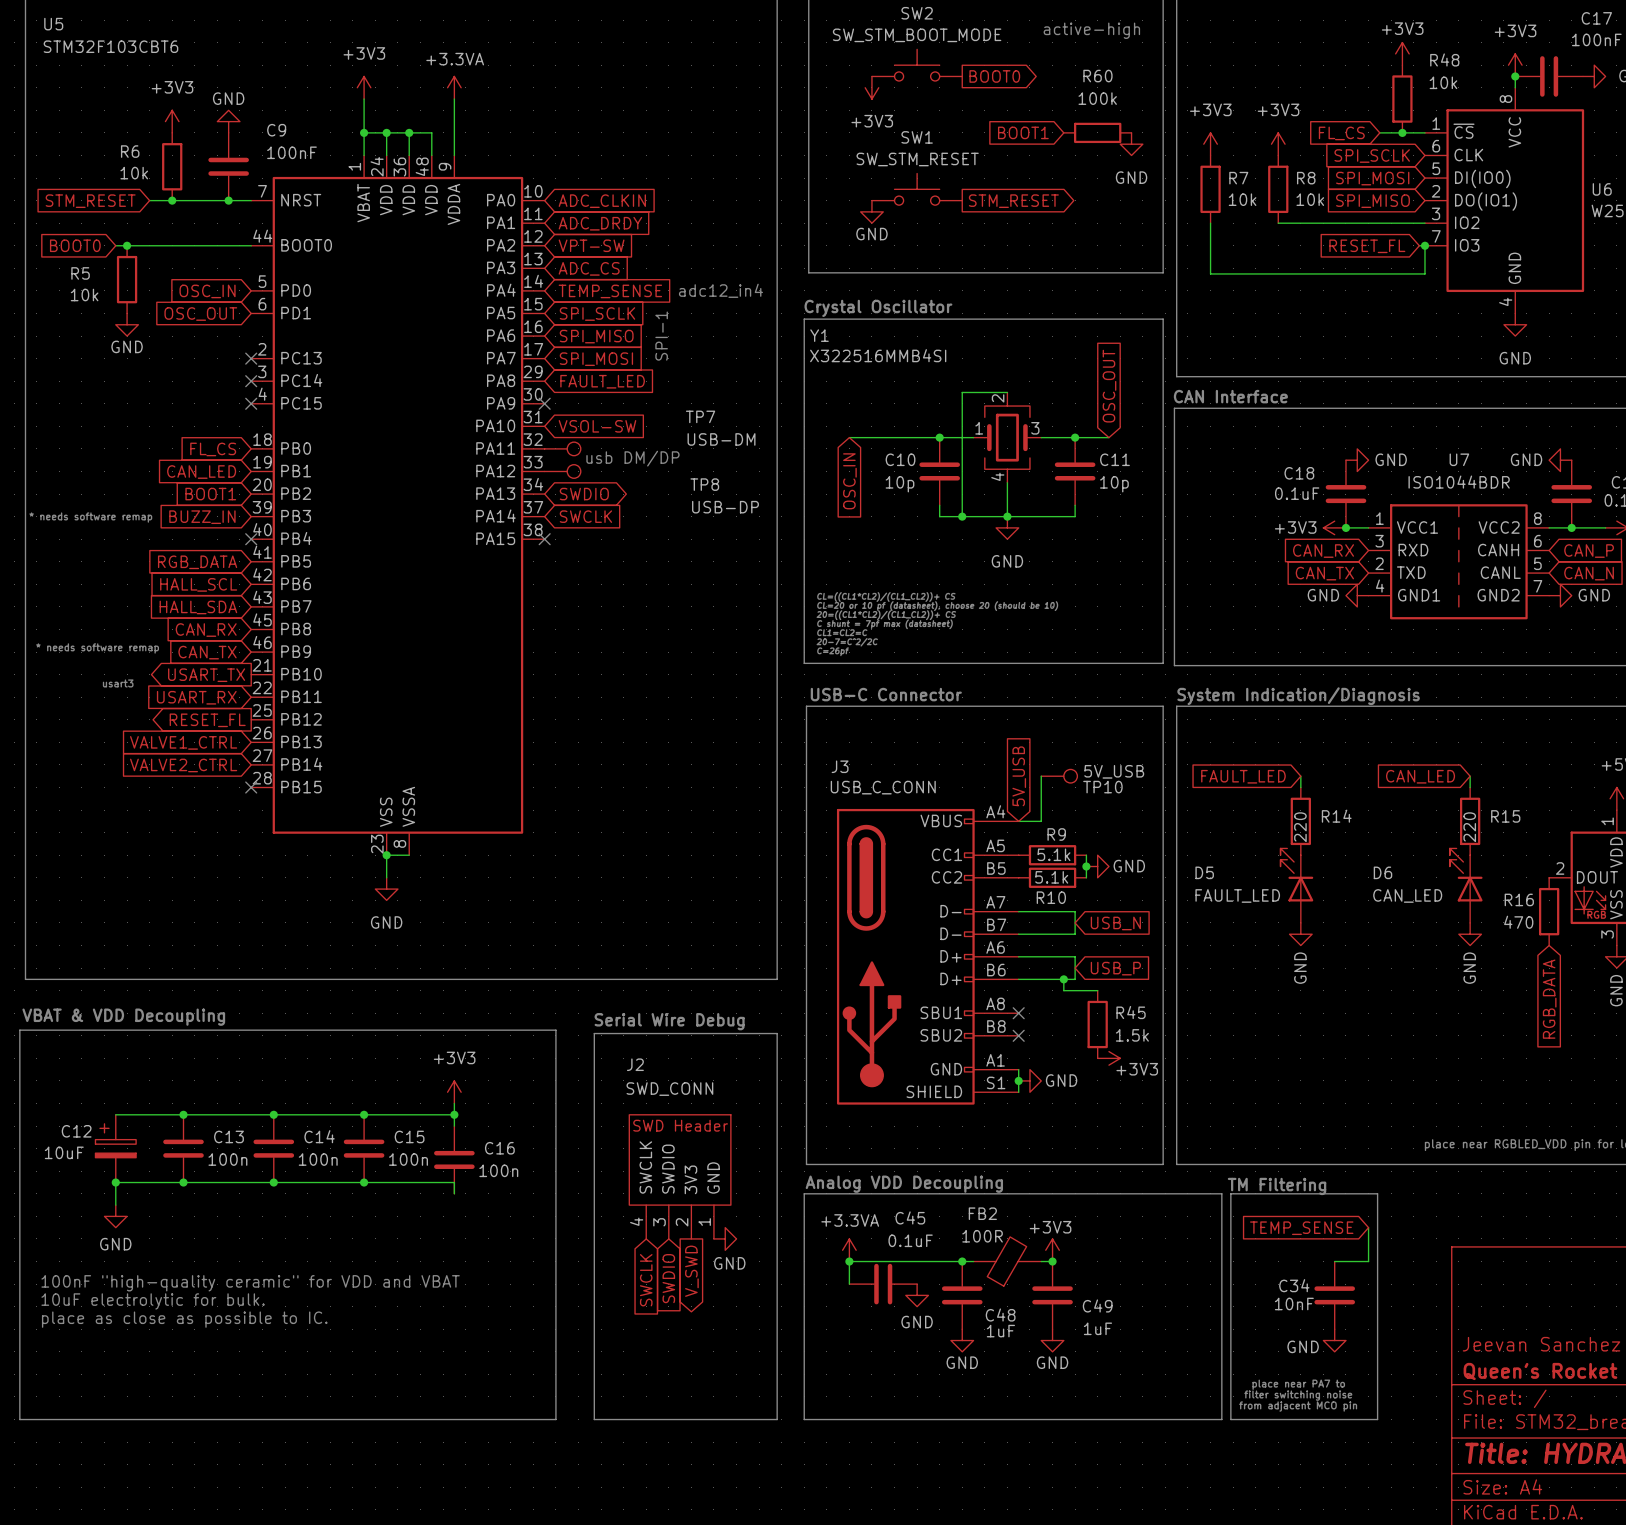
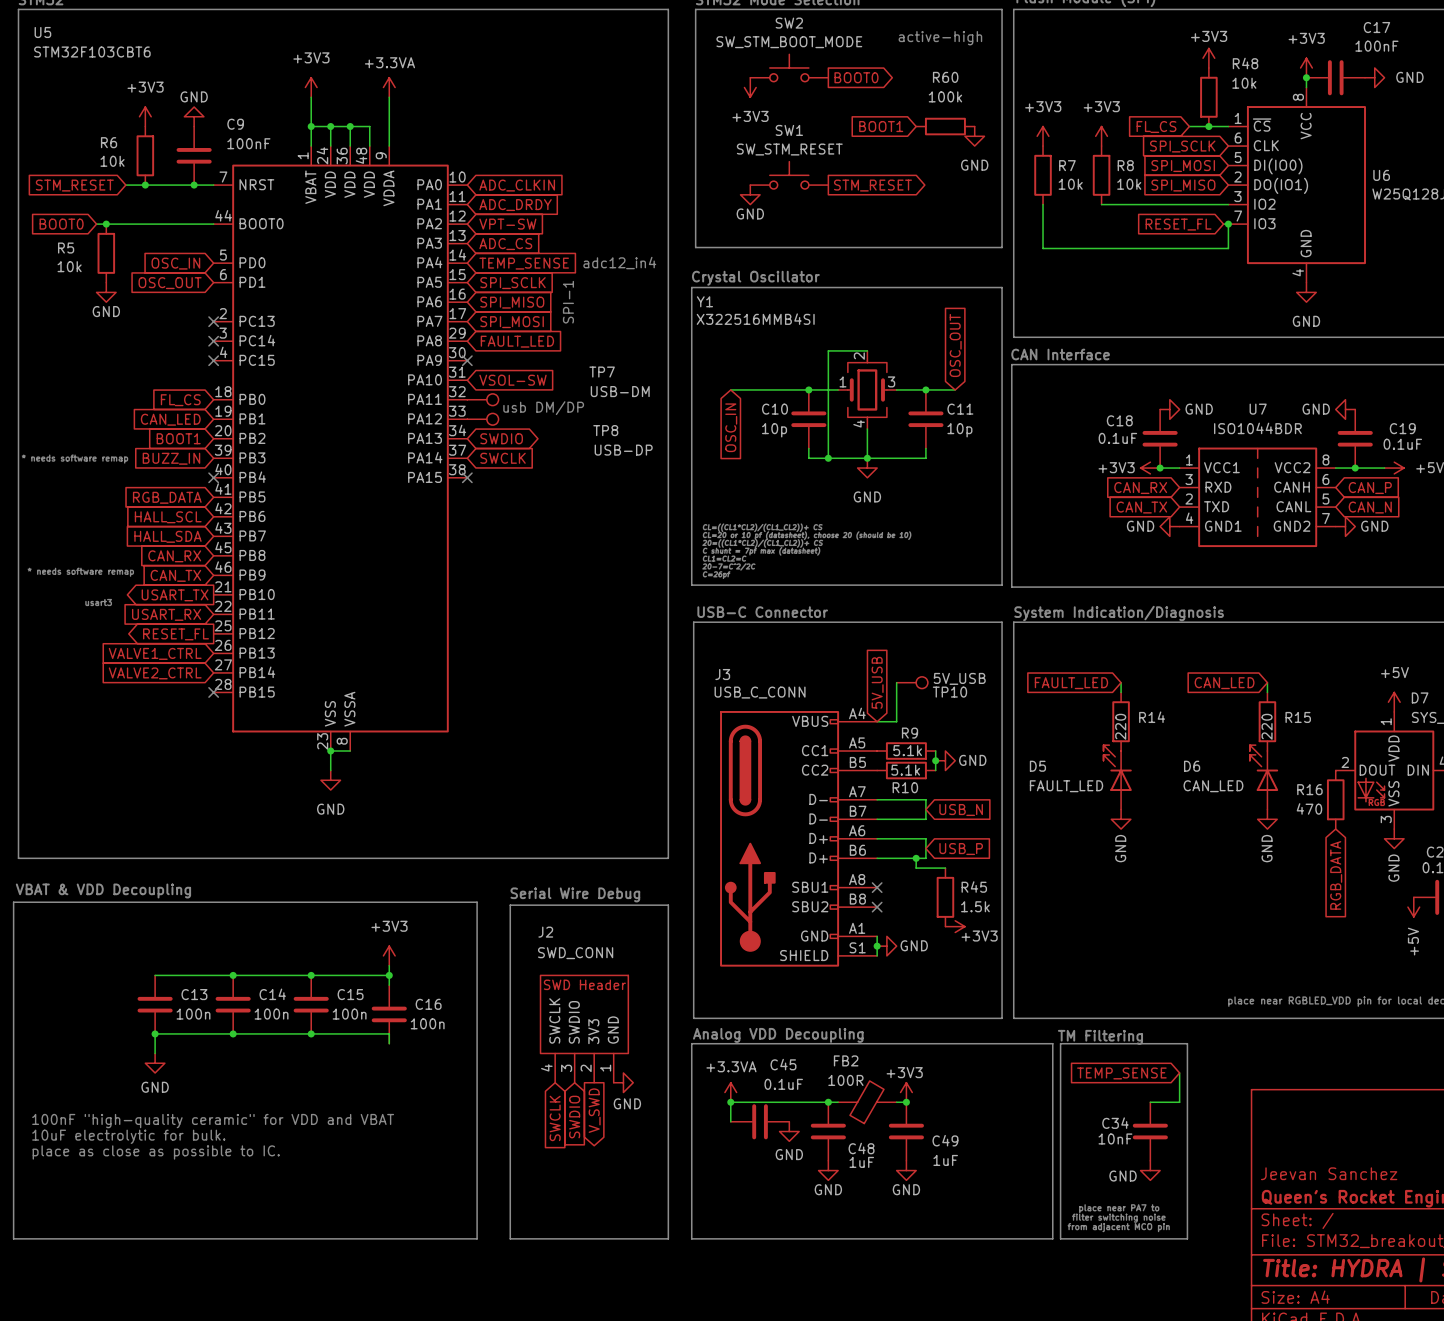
wire: (115, 1114) (183, 1114) -> none
junction: (183, 1114) -> none
C12: 10uF (115, 1148) -> none
junction: (115, 1182) -> none
wire: (183, 1182) (115, 1182) (115, 1205) -> (155, 1033) (155, 1053)
power symbol position: GND (115, 1216) -> GND (155, 1063)

